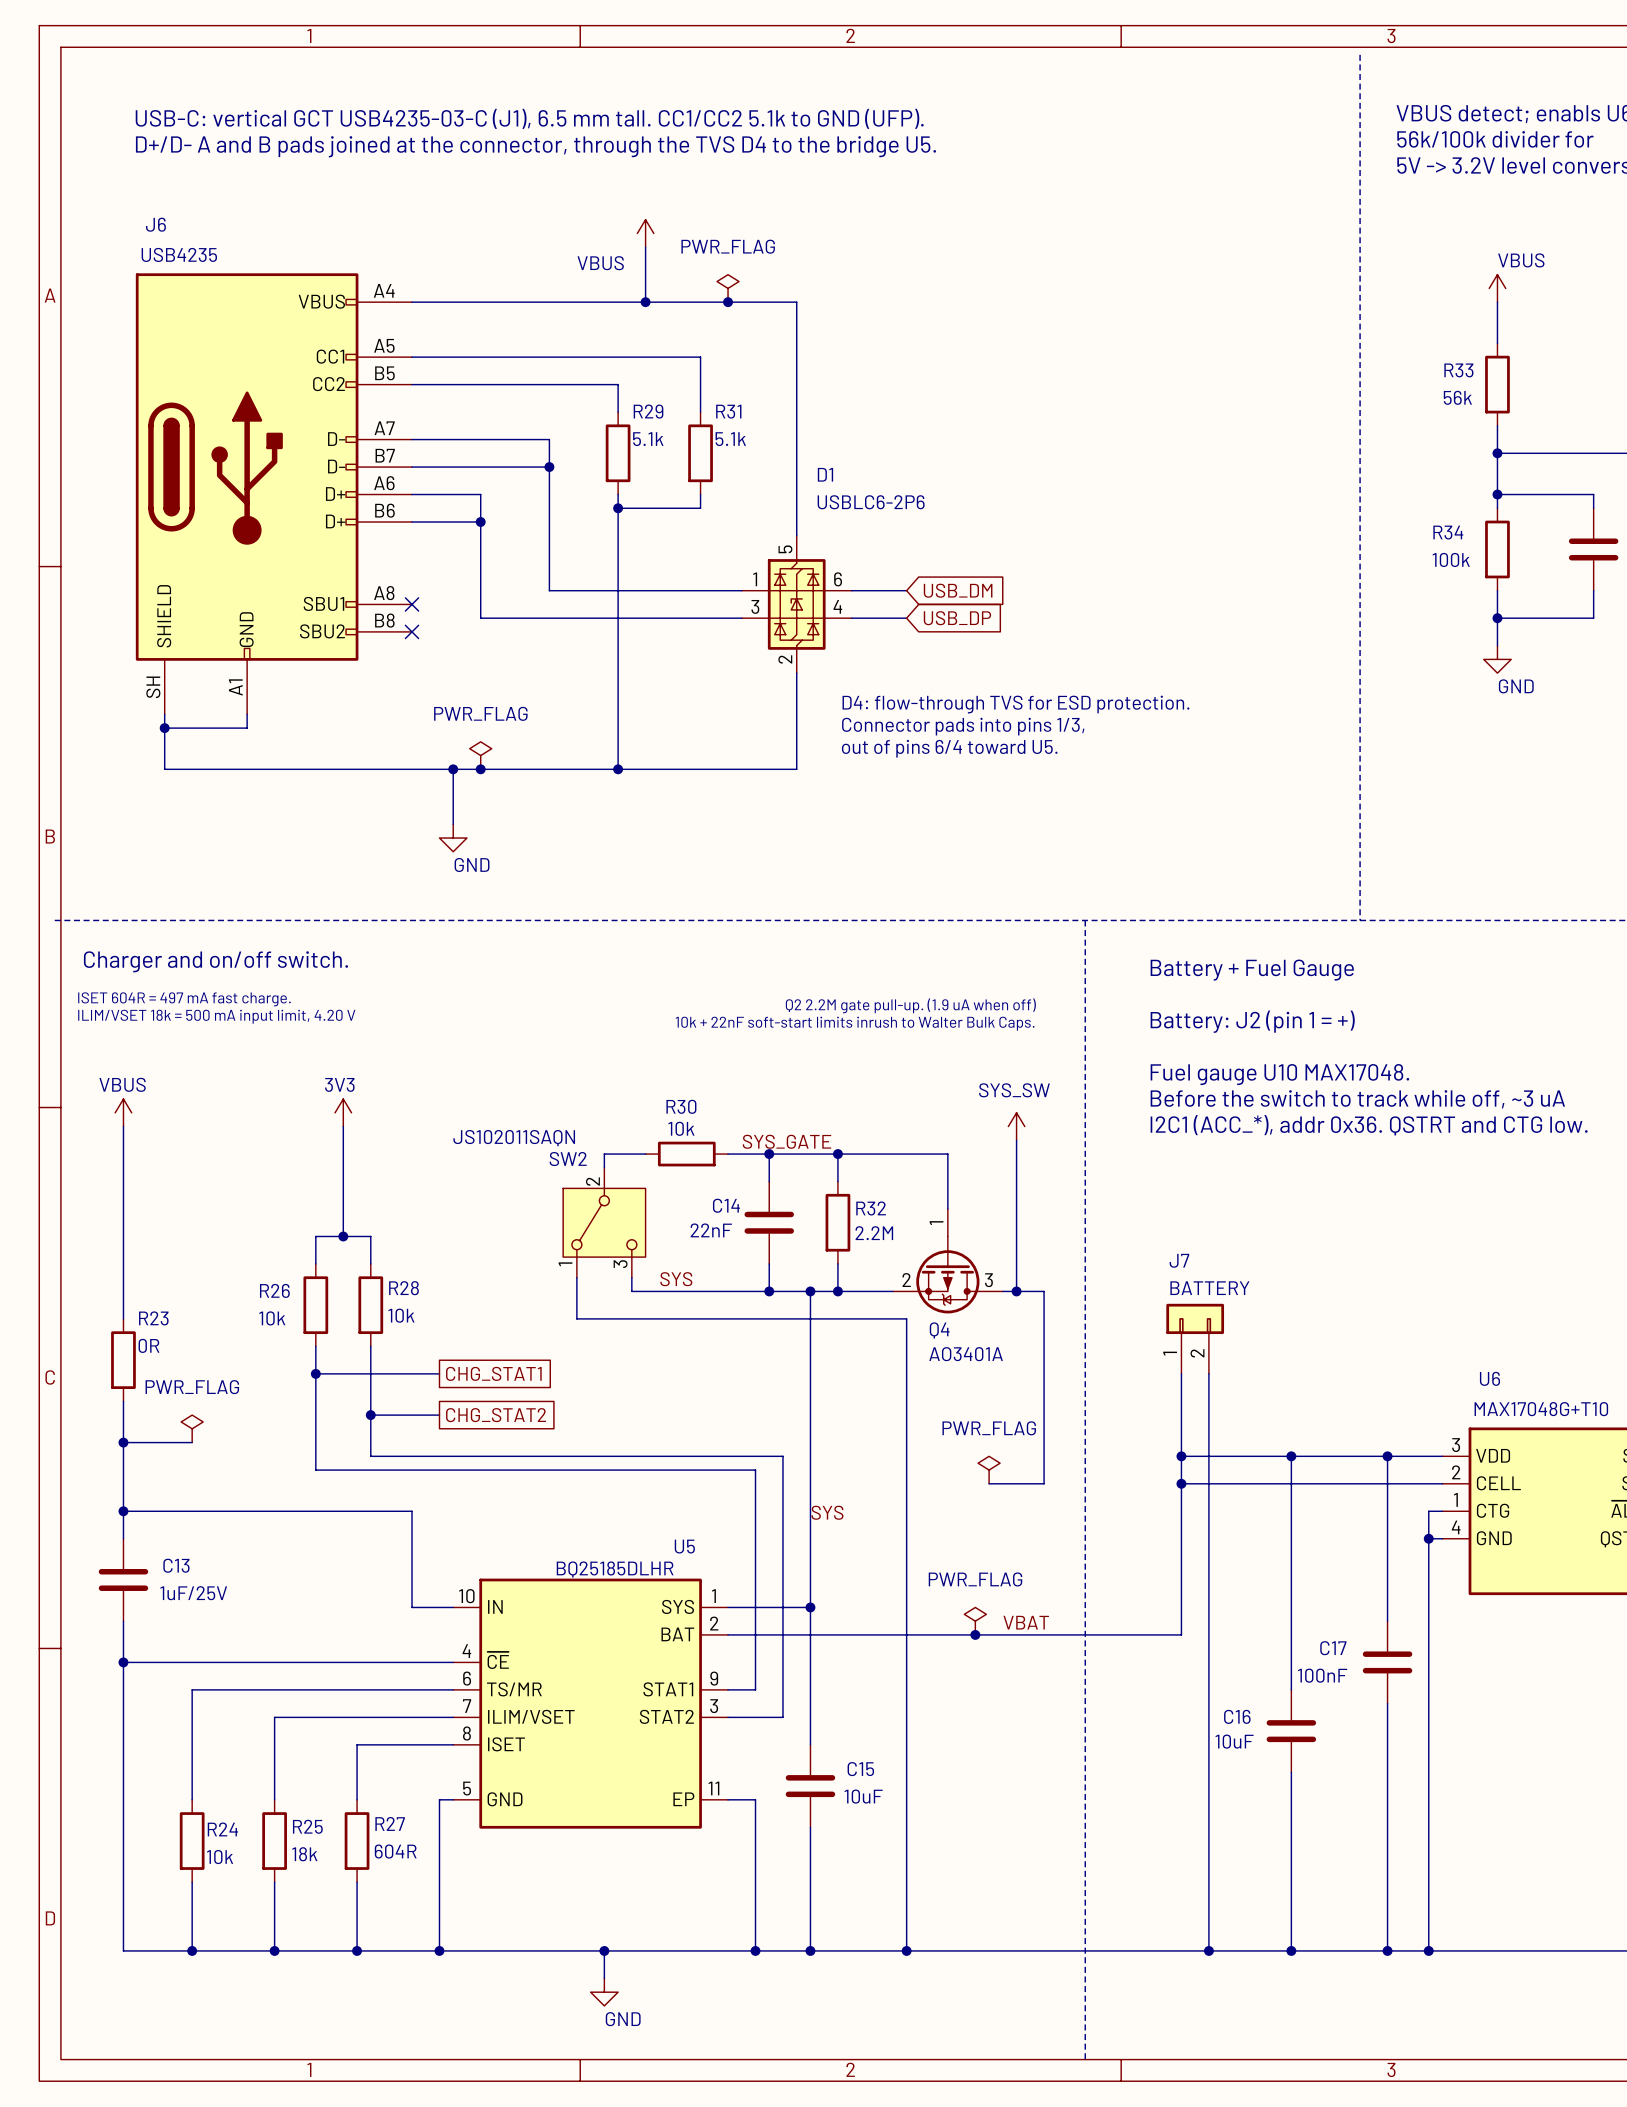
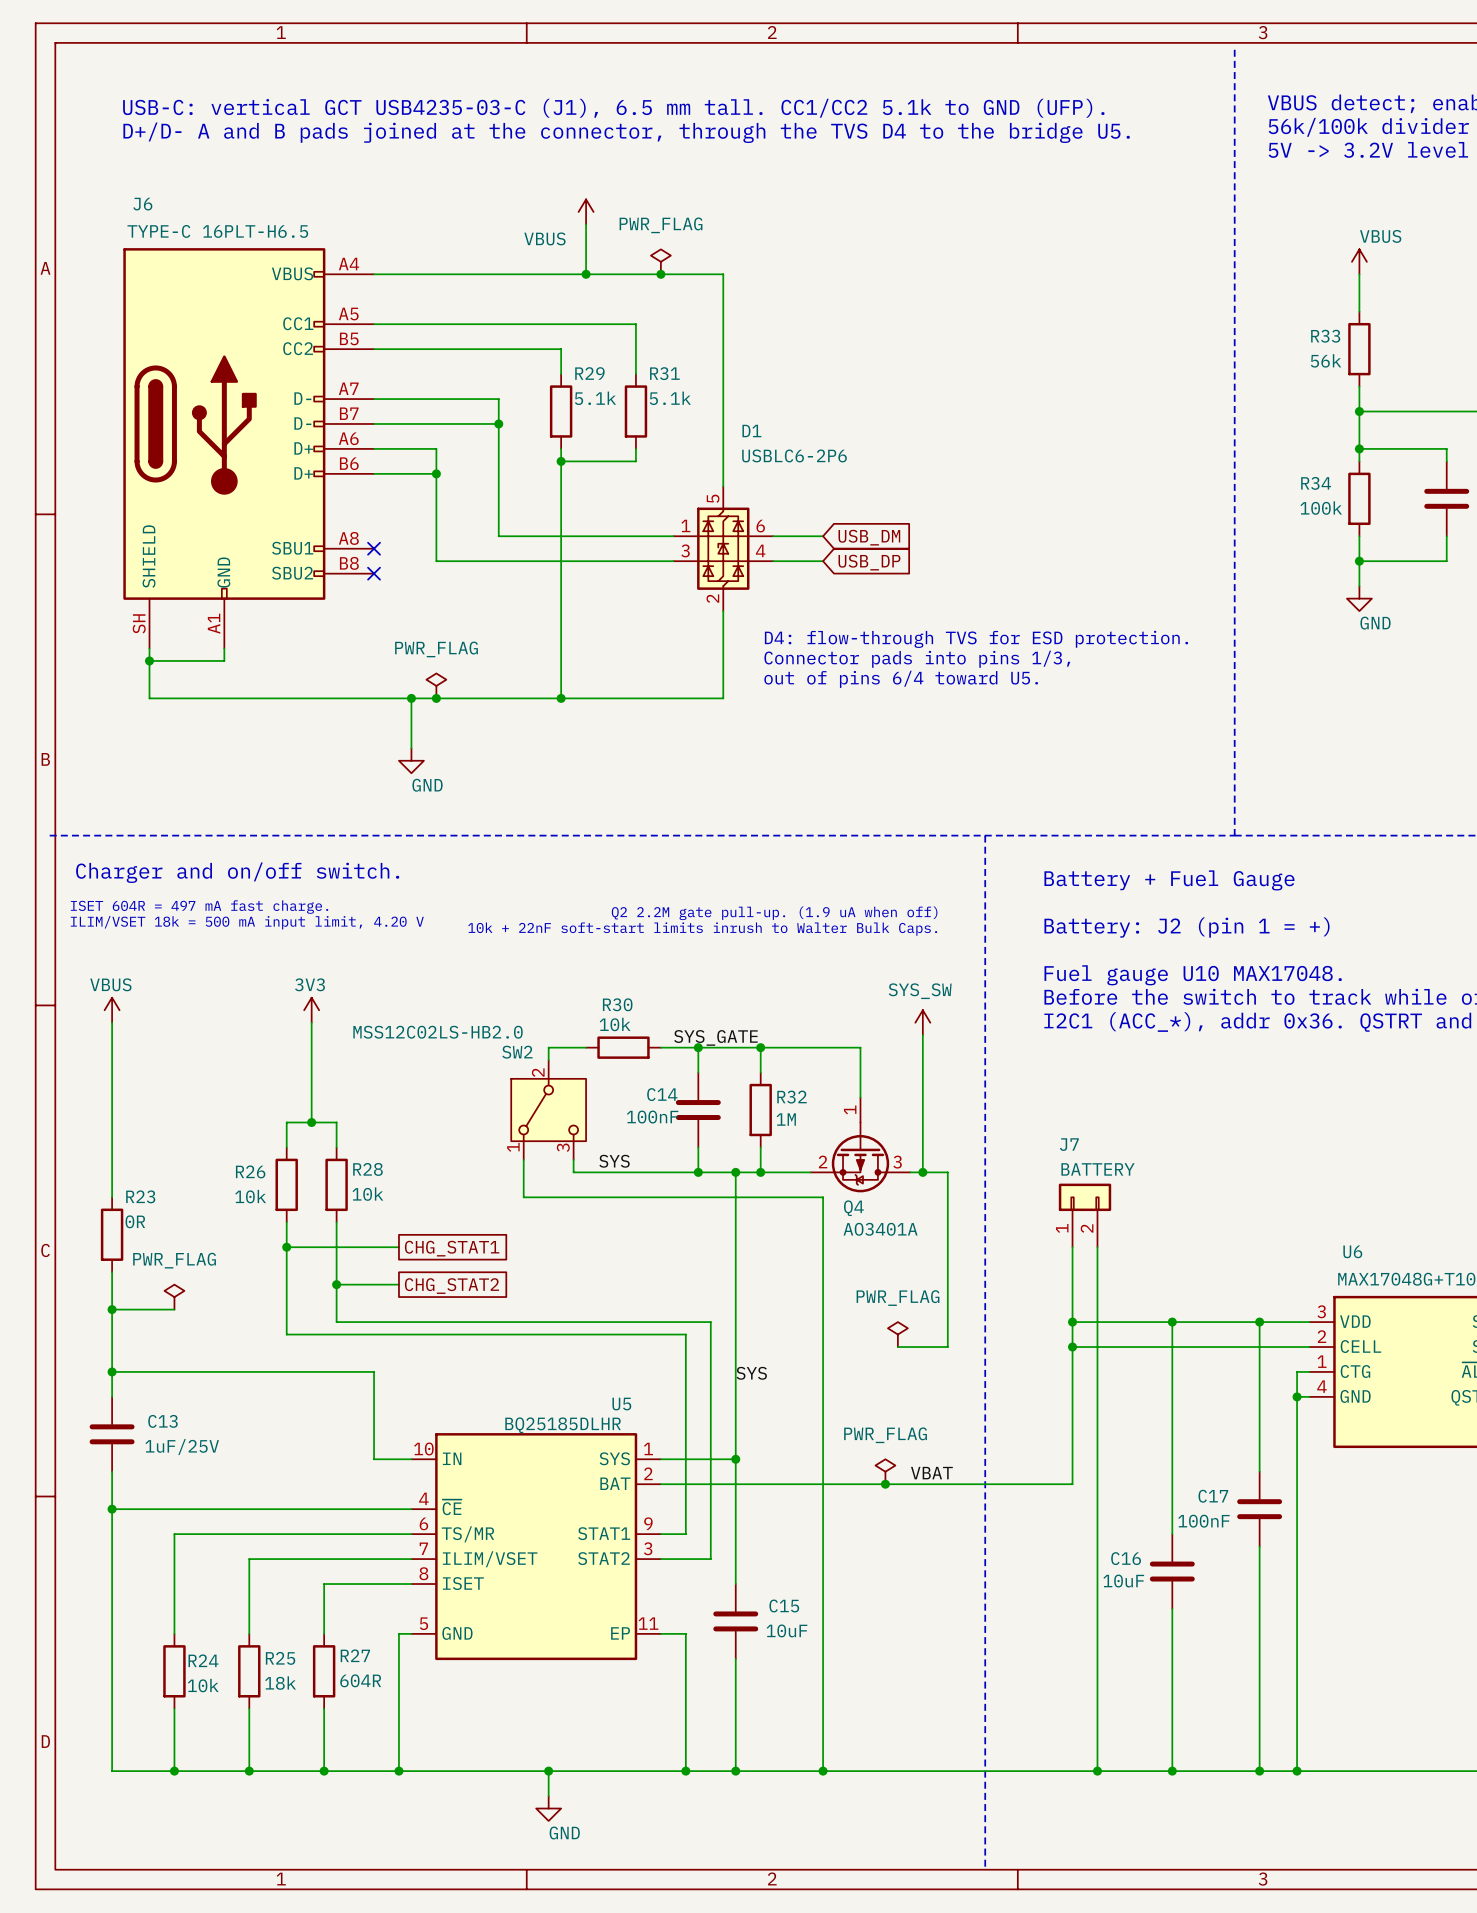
J6 value: USB4235 (179, 254) -> TYPE-C 16PLT-H6.5 (217, 231)
SW2 value: JS102011SAQN (514, 1138) -> MSS12C02LS-HB2.0 (438, 1032)
C14 value: 22nF (711, 1230) -> 100nF (652, 1117)
R32 value: 2.2M (874, 1233) -> 1M (786, 1119)

